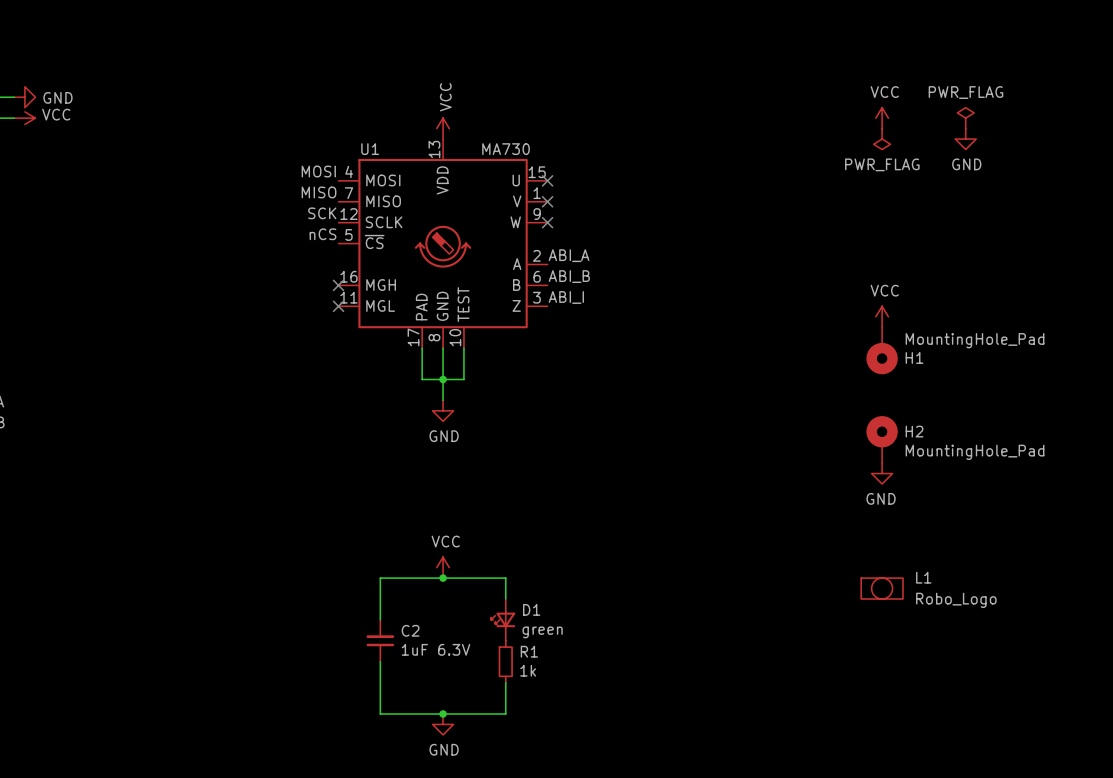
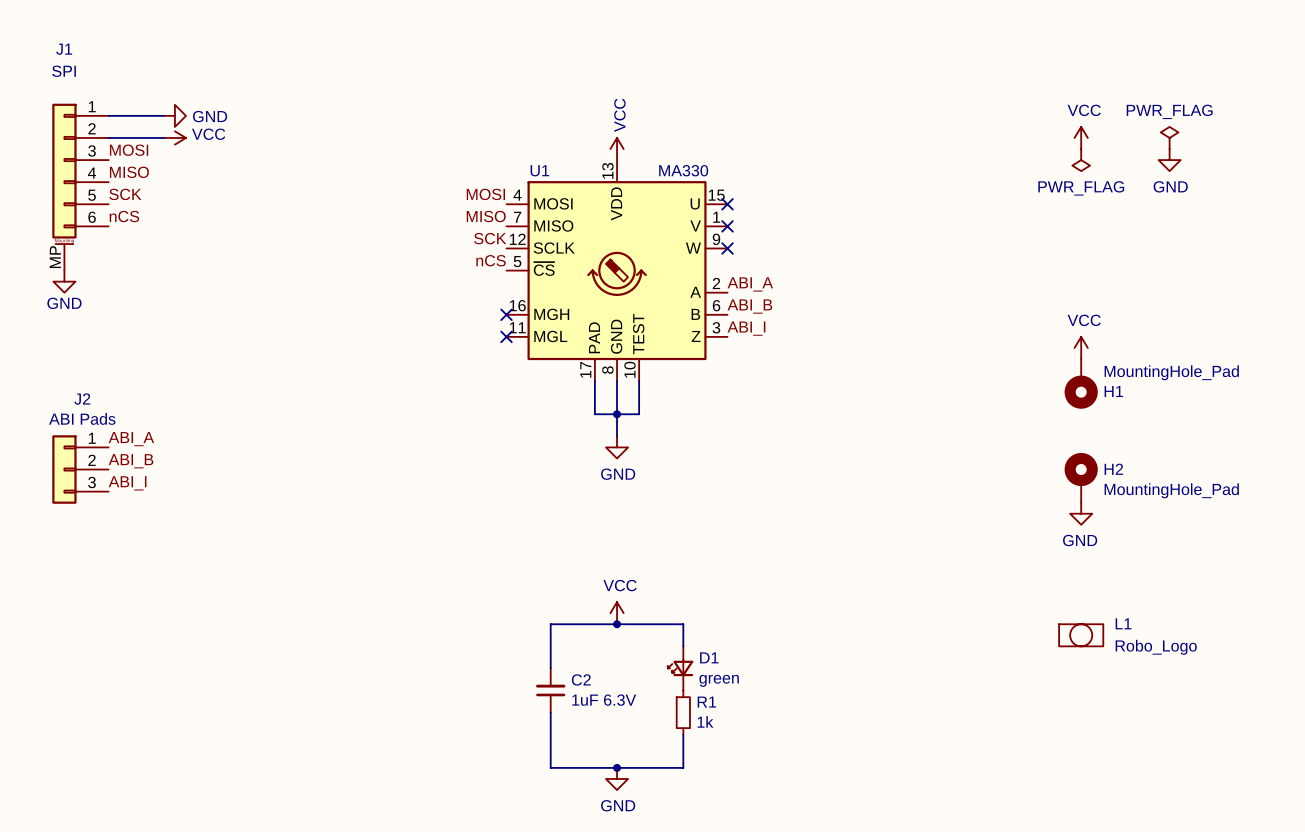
U1 value: MA730 (506, 149) -> MA330 (683, 170)

